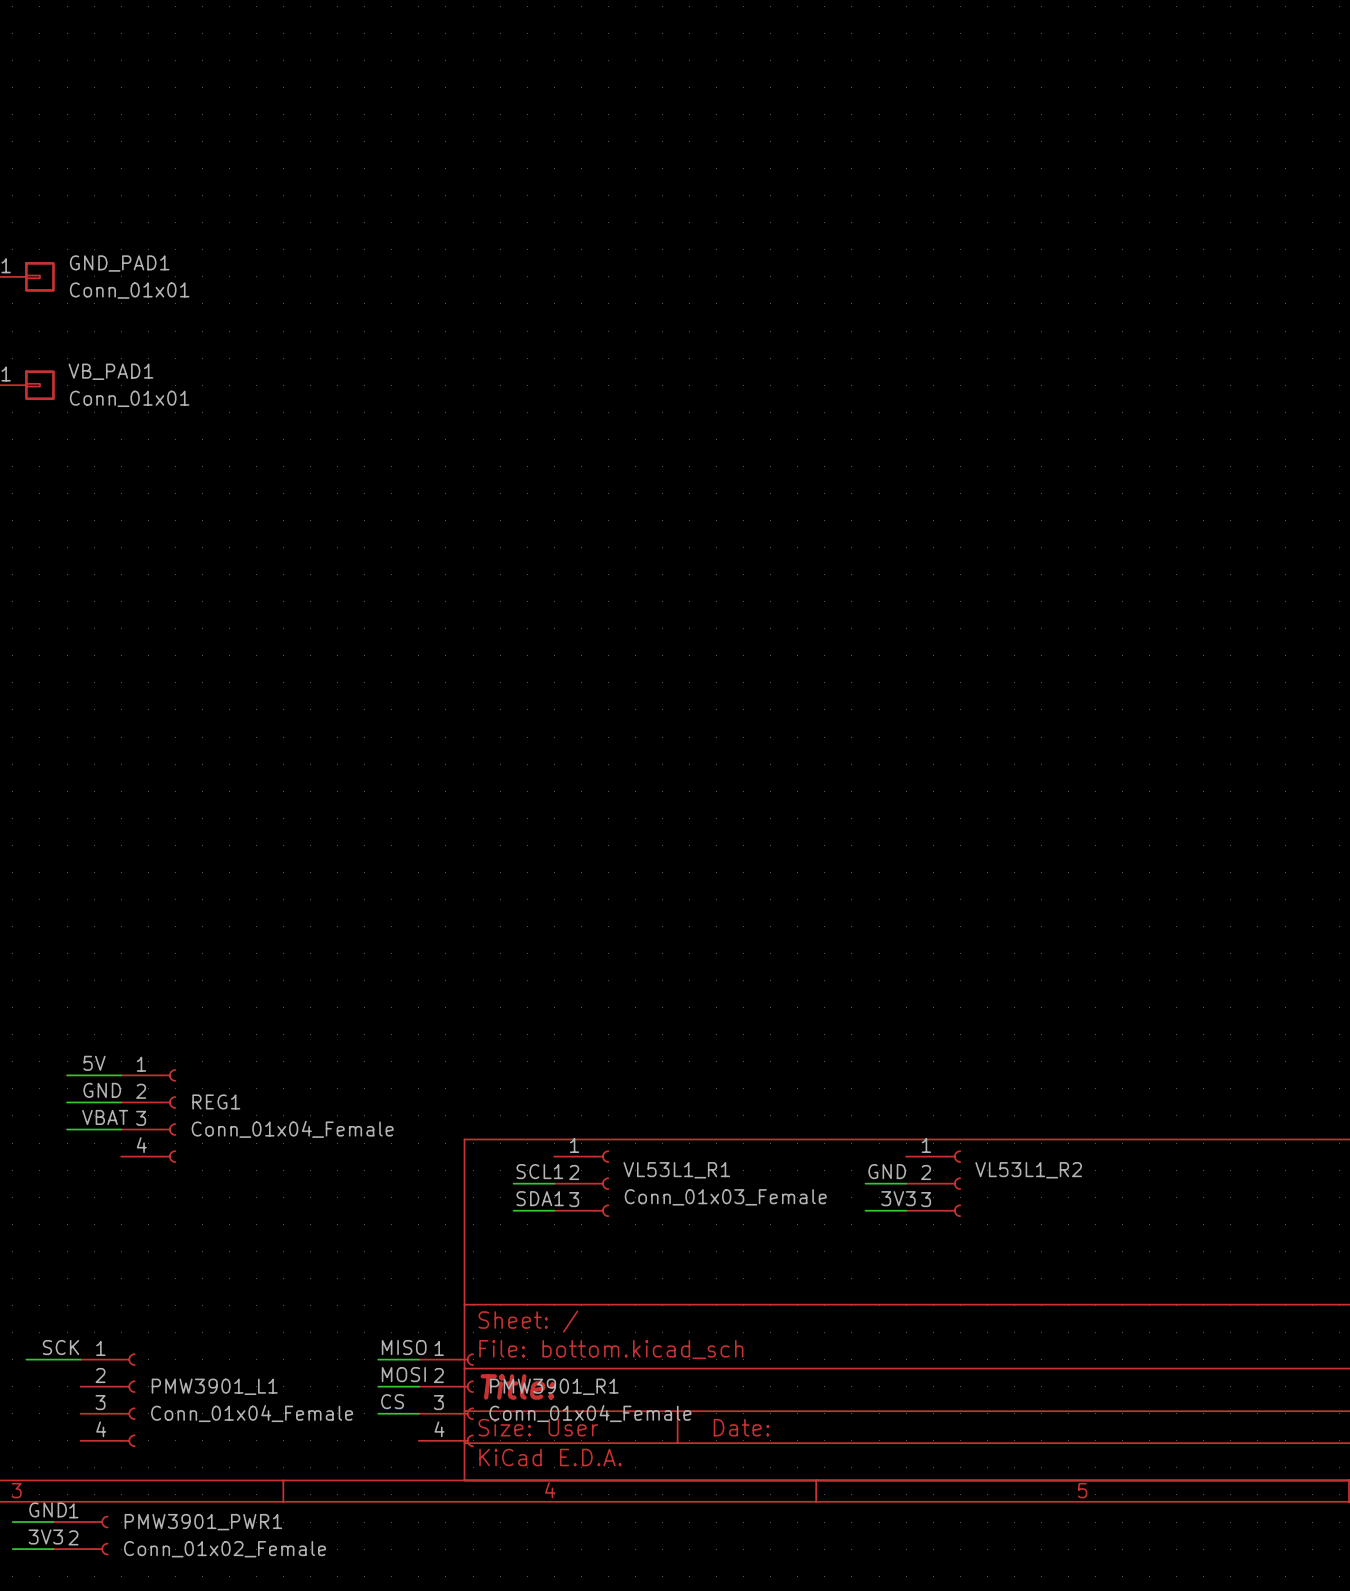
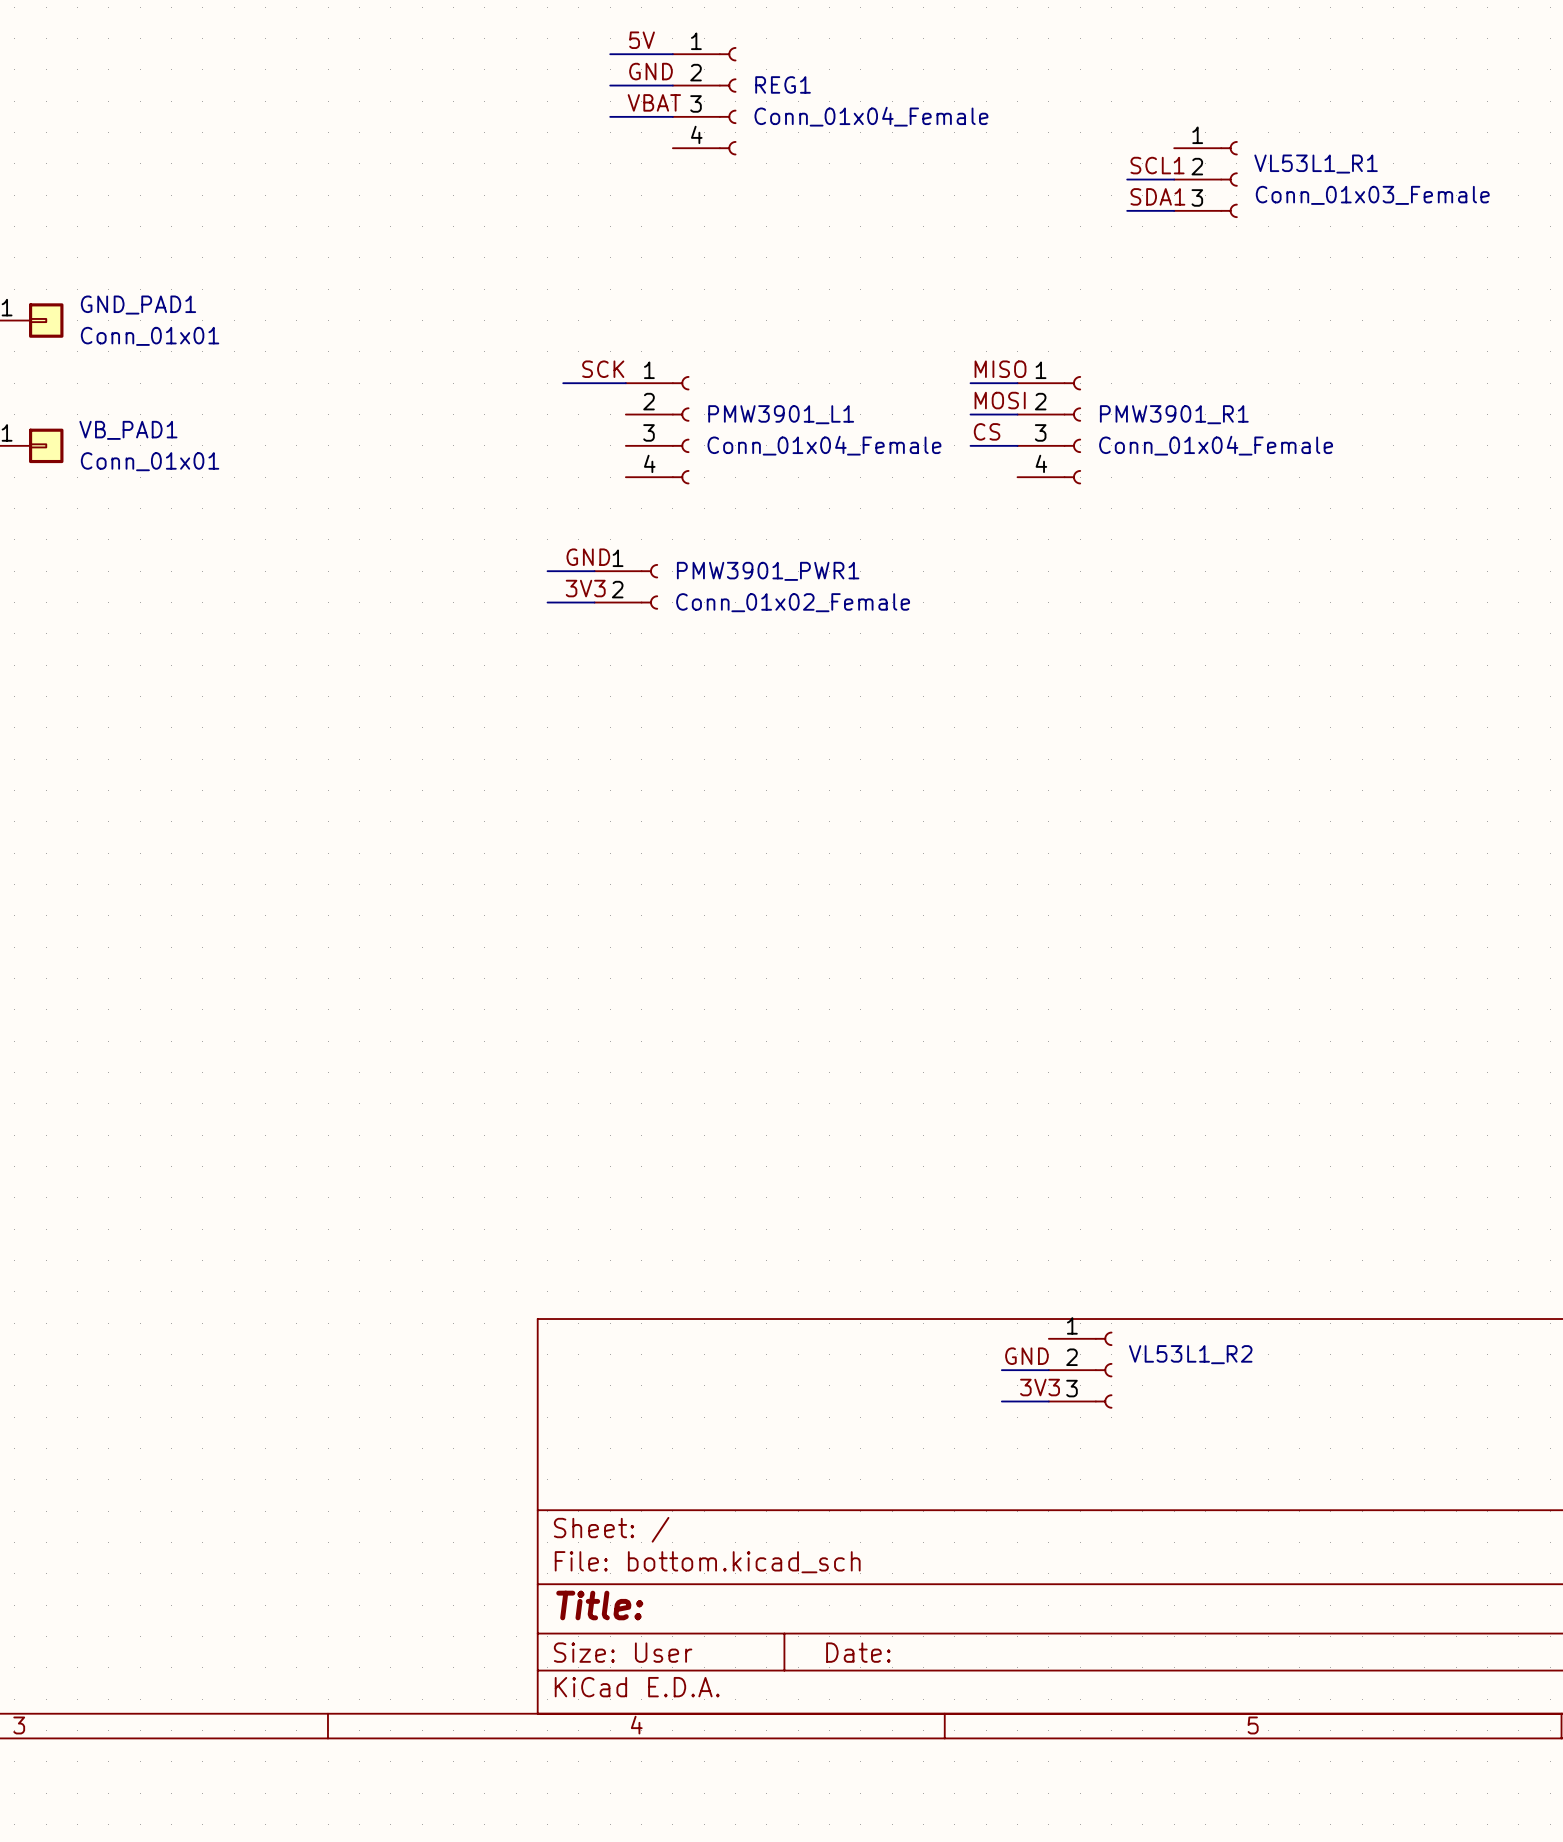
label: none -> 5V (642, 40)
wire: none -> (610, 54) (672, 54)
label: none -> GND (650, 71)
wire: none -> (610, 85) (672, 85)
label: none -> VBAT (654, 102)
wire: none -> (610, 116) (672, 116)
label: none -> SCL1 (1157, 165)
wire: none -> (1127, 179) (1174, 179)
label: none -> SDA1 (1157, 196)
wire: none -> (1127, 210) (1174, 210)
label: none -> SCK (603, 369)
label: none -> MISO (1000, 369)
wire: none -> (563, 383) (625, 383)
wire: none -> (970, 383) (1017, 383)
label: none -> MOSI (1000, 400)
wire: none -> (970, 414) (1017, 414)
label: none -> CS (987, 431)
wire: none -> (970, 445) (1017, 445)
label: none -> GND (588, 557)
wire: none -> (547, 571) (594, 571)
label: none -> 3V3 (585, 588)
wire: none -> (547, 602) (594, 602)
label: 5V (94, 1063) -> none
wire: (67, 1075) (121, 1075) -> none
label: GND (102, 1090) -> none
wire: (67, 1102) (121, 1102) -> none
REG1 position: (148, 1115) -> (704, 101)
label: VBAT (105, 1117) -> none
wire: (67, 1129) (121, 1129) -> none
label: SCL1 (539, 1171) -> none
wire: (513, 1183) (554, 1183) -> none
VL53L1_R1 position: (581, 1183) -> (1206, 179)
label: SDA1 (540, 1198) -> none
wire: (513, 1210) (554, 1210) -> none
label: SCK (60, 1347) -> none
label: MISO (404, 1347) -> none
wire: (26, 1359) (80, 1359) -> none
wire: (378, 1359) (418, 1359) -> none
label: MOSI (403, 1374) -> none
wire: (378, 1386) (418, 1386) -> none
PMW3901_L1 position: (108, 1400) -> (657, 430)
PMW3901_R1 position: (446, 1400) -> (1049, 430)
label: CS (392, 1401) -> none
wire: (378, 1413) (418, 1413) -> none
label: GND (48, 1509) -> none
wire: (12, 1522) (53, 1522) -> none
PMW3901_PWR1 position: (80, 1535) -> (626, 586)
label: 3V3 (45, 1536) -> none
wire: (12, 1549) (53, 1549) -> none

